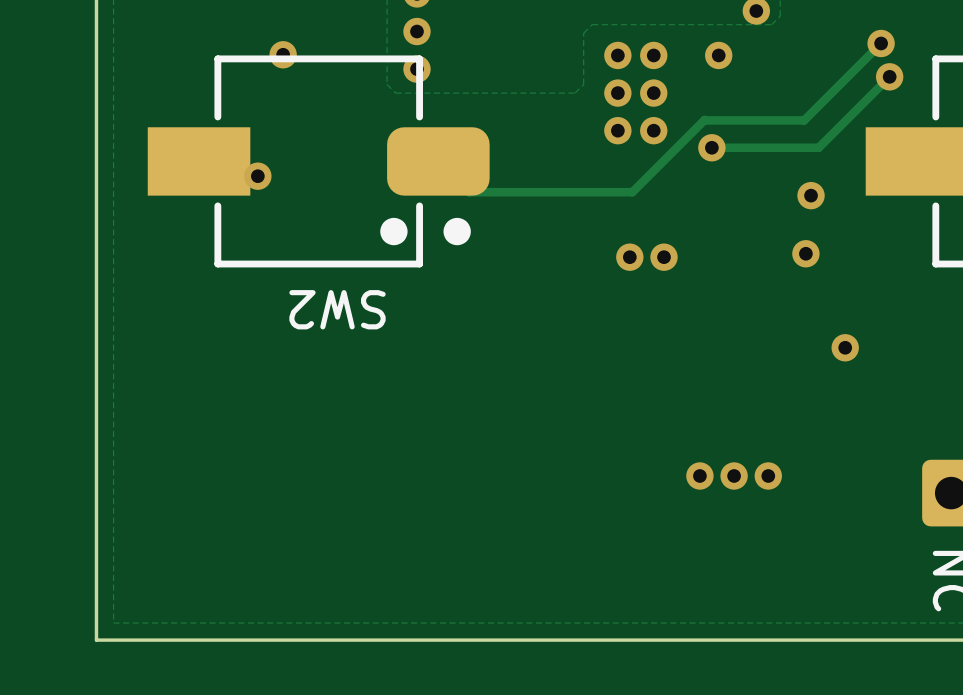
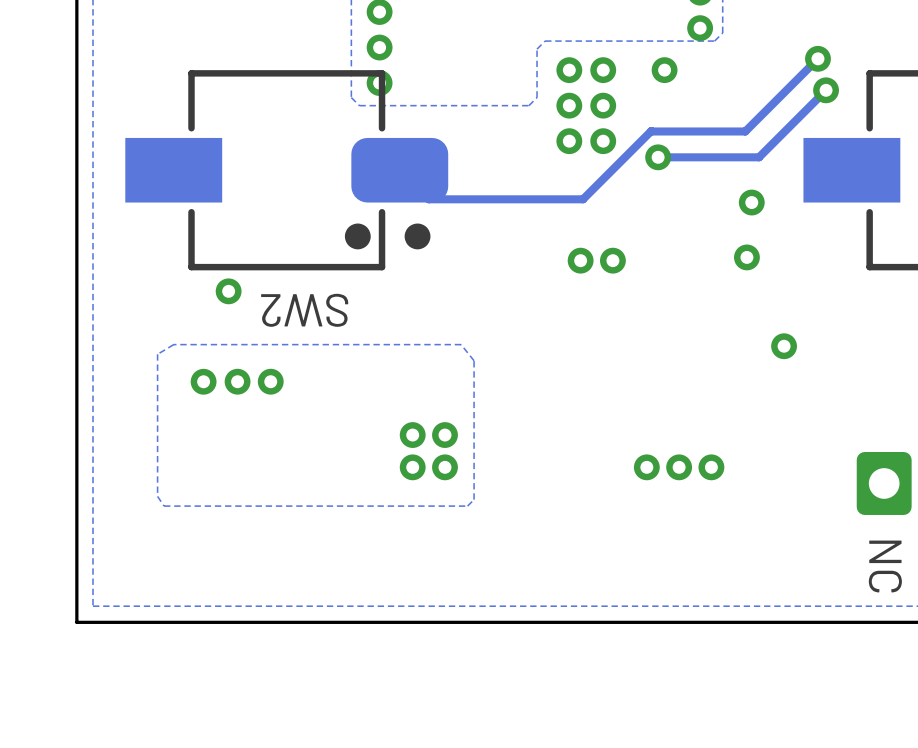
via: (283, 54) -> none
via: (257, 176) -> none
via: none -> (228, 291)
zone outline: none -> (461, 344) (474, 360) (474, 499) (467, 506) (164, 506) (157, 496) (157, 354) (173, 344) (461, 344)
via: none -> (203, 381)
via: none -> (237, 381)
via: none -> (270, 381)
via: none -> (412, 435)
via: none -> (444, 435)
via: none -> (412, 467)
via: none -> (444, 467)

